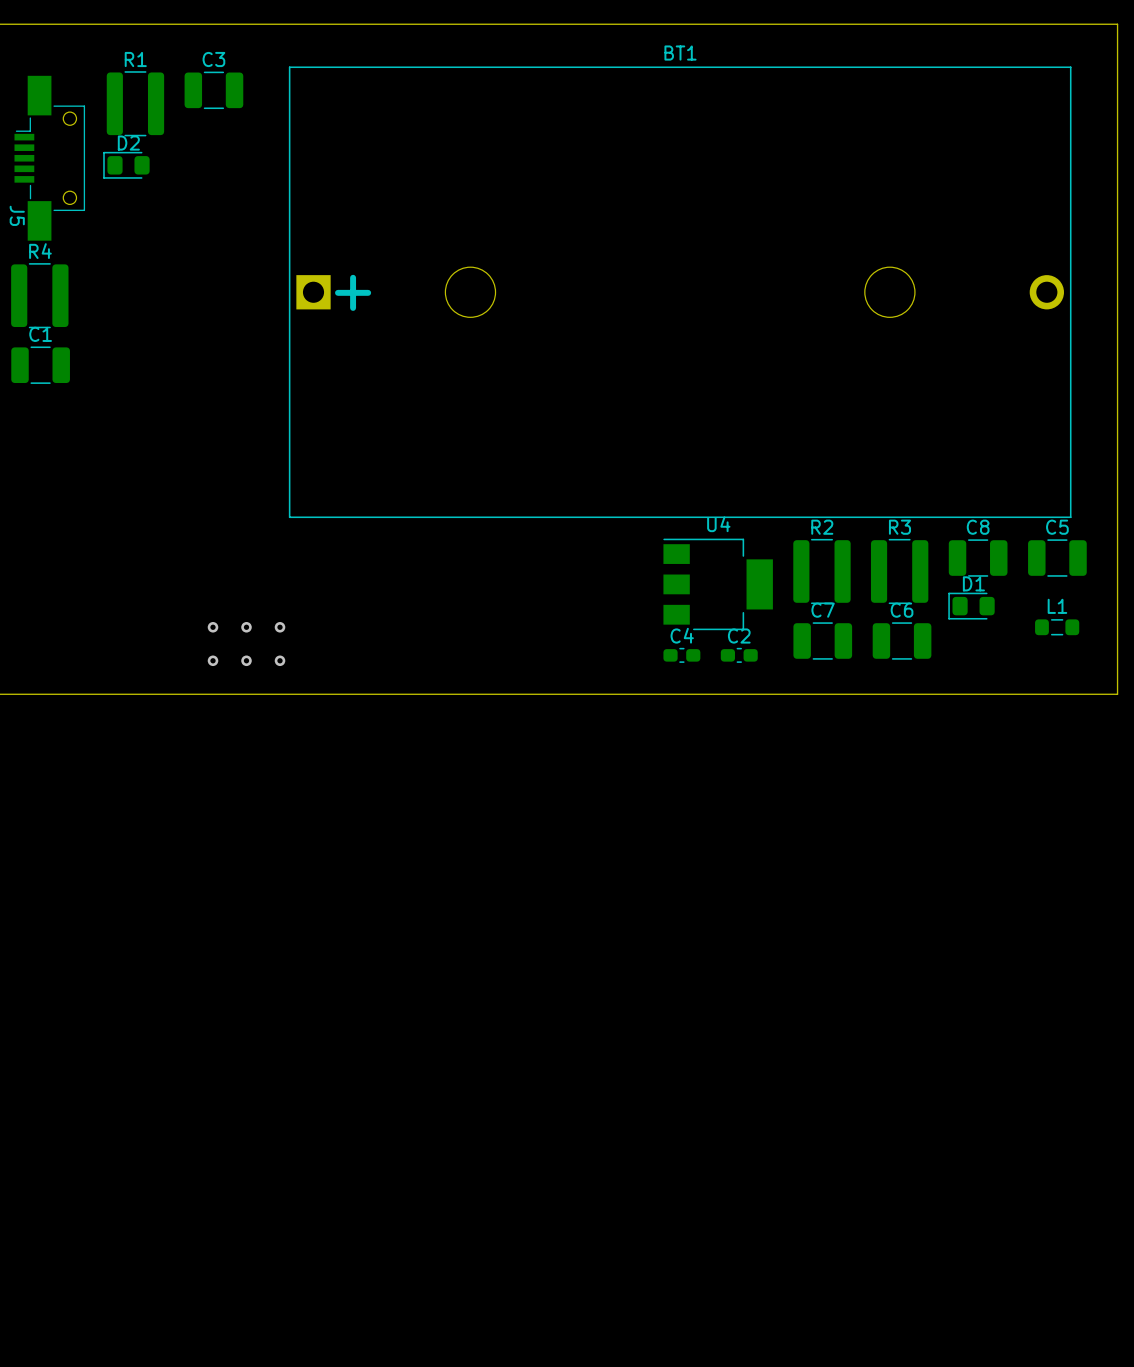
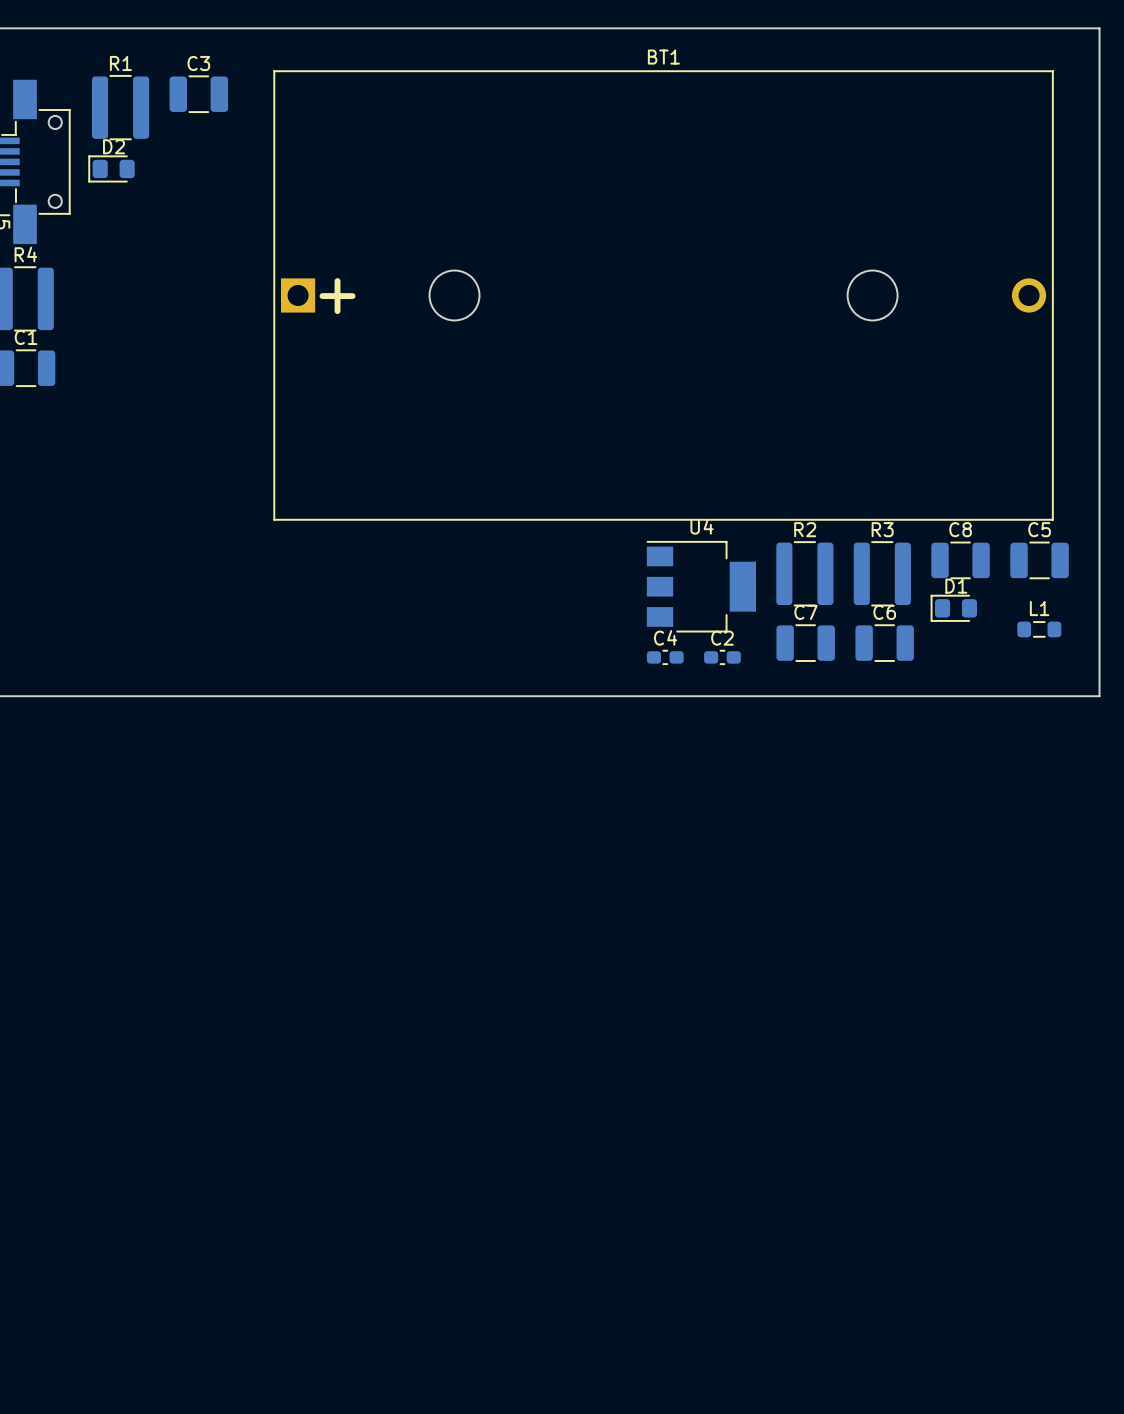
via: (213, 627) -> none
via: (246, 627) -> none
via: (280, 627) -> none
via: (213, 660) -> none
via: (246, 660) -> none
via: (280, 660) -> none

